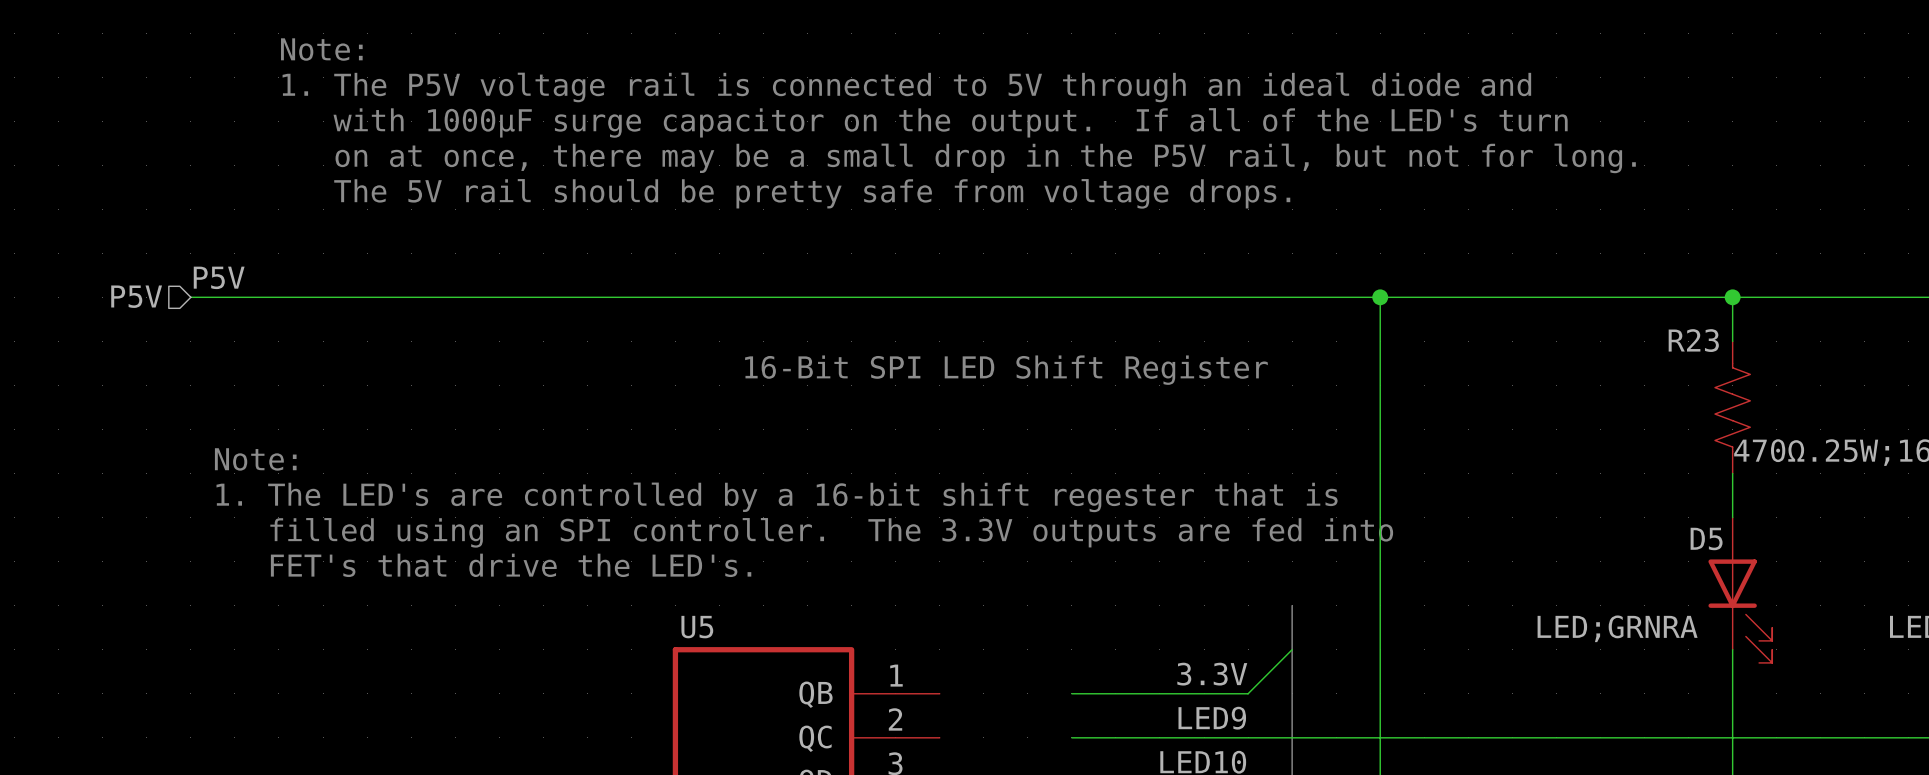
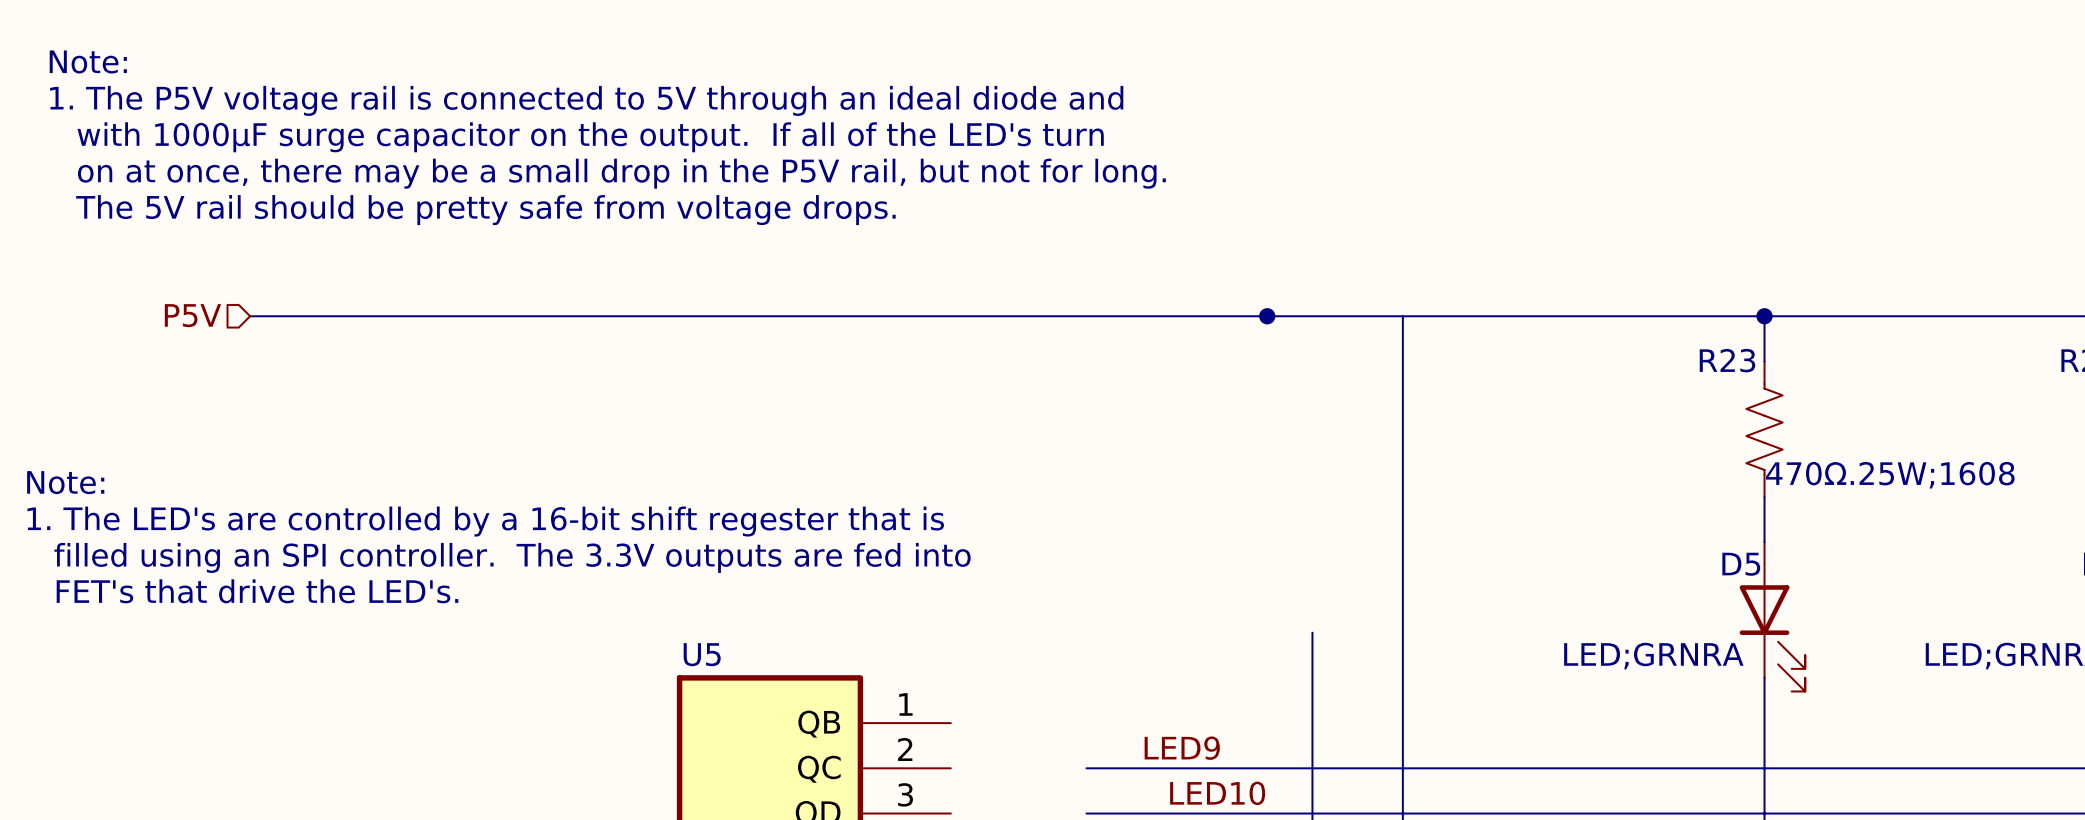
text: none -> Note: (88, 61)
text: Note: (321, 49) -> none
text position: 1. The P5V voltage rail is connected to 5V through an ideal diode and (906, 87) -> 1. The P5V voltage rail is connected to 5V through an ideal diode and (586, 100)
text position: with 1000µF surge capacitor on the output. If all of the LED's turn (950, 122) -> with 1000µF surge capacitor on the output. If all of the LED's turn (590, 137)
text position: on at once, there may be a small drop in the P5V rail, but not for long. (985, 158) -> on at once, there may be a small drop in the P5V rail, but not for long. (621, 173)
text position: The 5V rail should be pretty safe from voltage drops. (812, 193) -> The 5V rail should be pretty safe from voltage drops. (485, 210)
label: P5V (219, 277) -> none
hierarchical label position: P5V (136, 296) -> P5V (192, 315)
wire: (190, 297) (256, 297) -> none
junction: none -> (1267, 316)
junction: (1380, 297) -> none
text: 16-Bit SPI LED Shift Register (1006, 370) -> none
text position: Note: (255, 459) -> Note: (65, 482)
text position: 1. The LED's are controlled by a 16-bit shift regester that is (777, 497) -> 1. The LED's are controlled by a 16-bit shift regester that is (485, 521)
text position: filled using an SPI controller. The 3.3V outputs are fed into (831, 532) -> filled using an SPI controller. The 3.3V outputs are fed into (512, 557)
text position: FET's that drive the LED's. (511, 565) -> FET's that drive the LED's. (257, 591)
wire: (1292, 649) (1248, 693) (1071, 693) -> none
label: 3.3V (1212, 674) -> none
label position: LED9 (1212, 718) -> LED9 (1182, 748)

